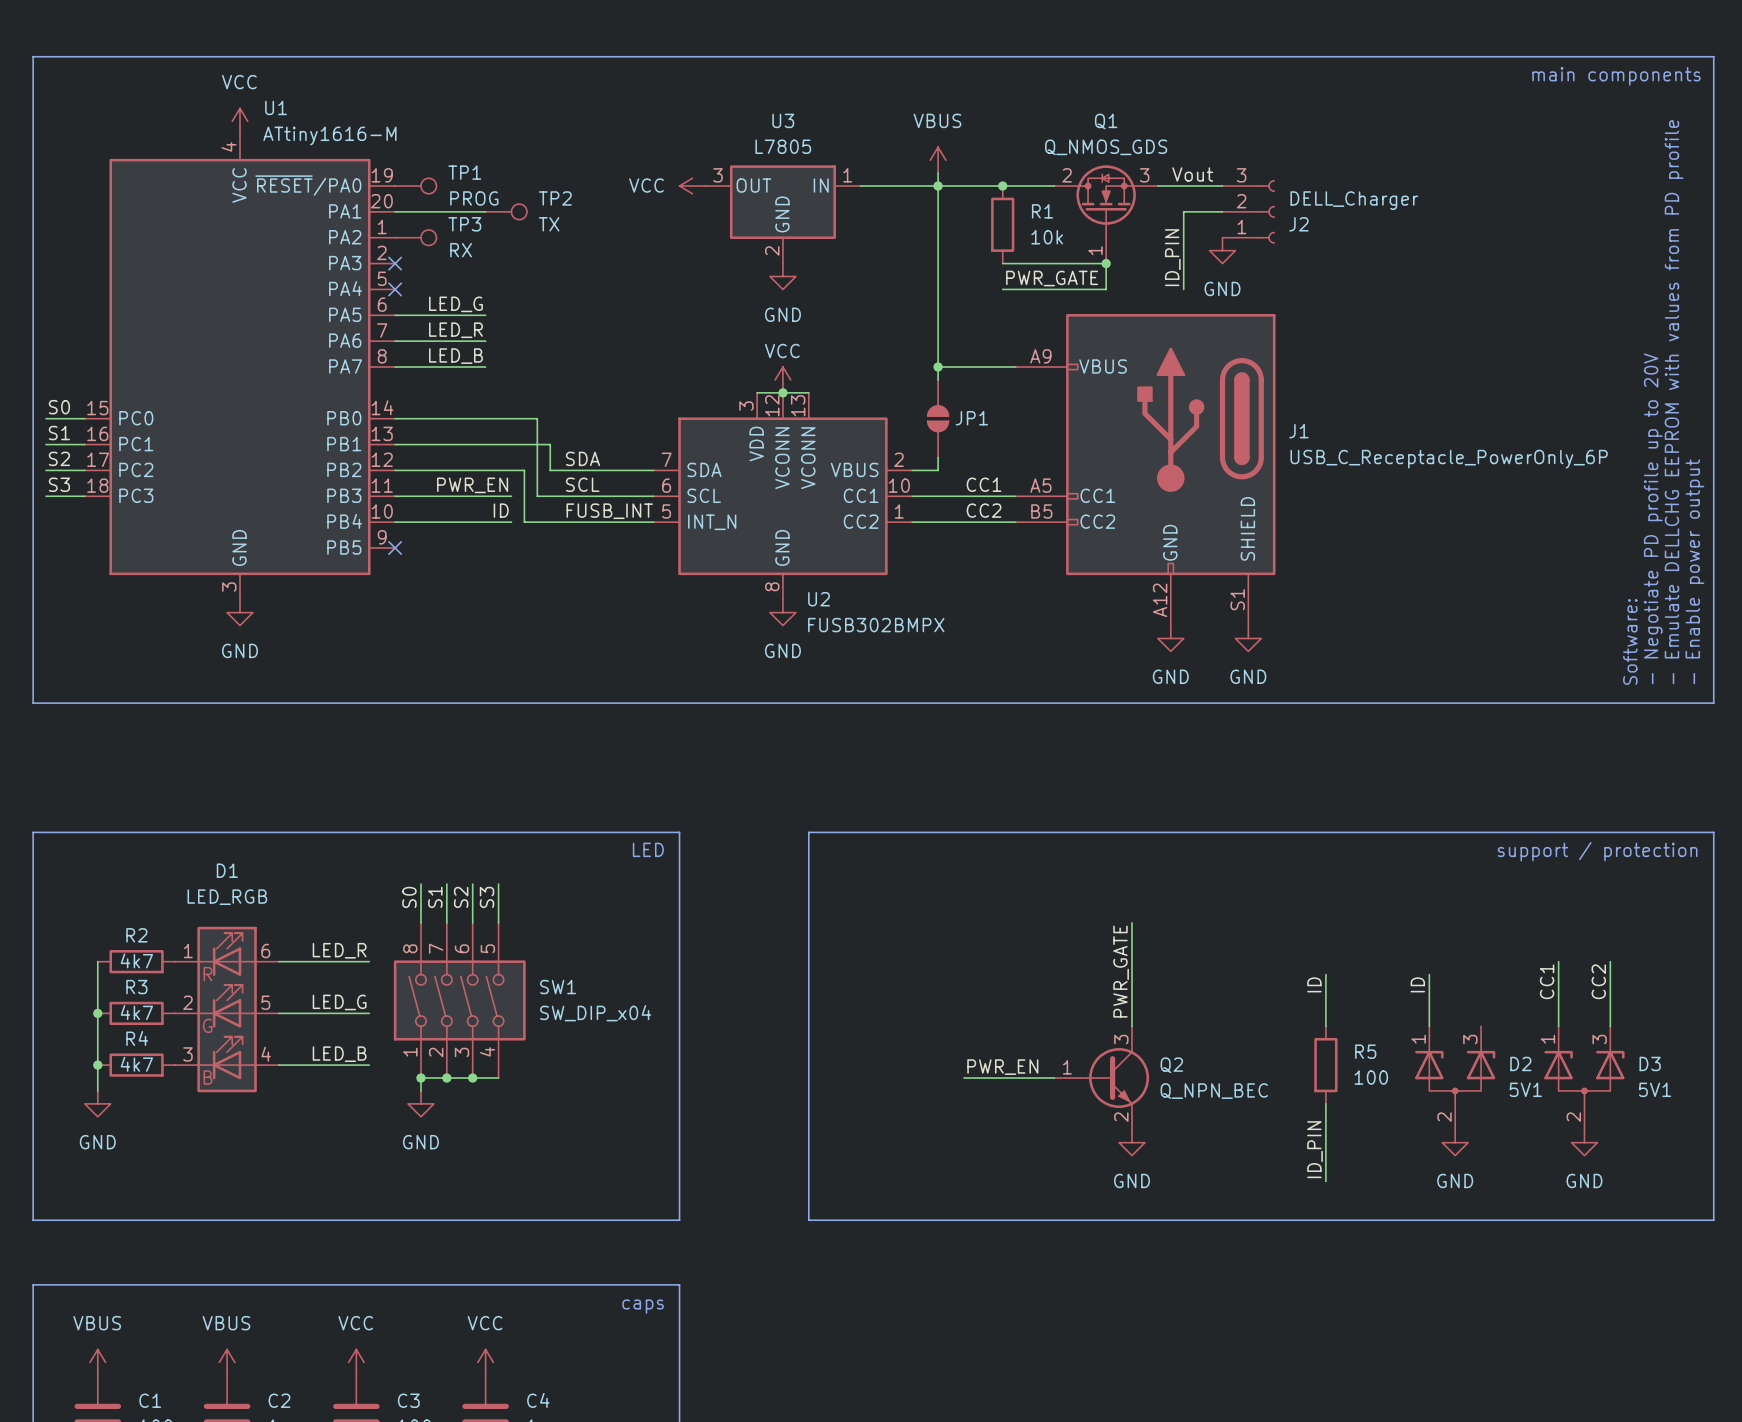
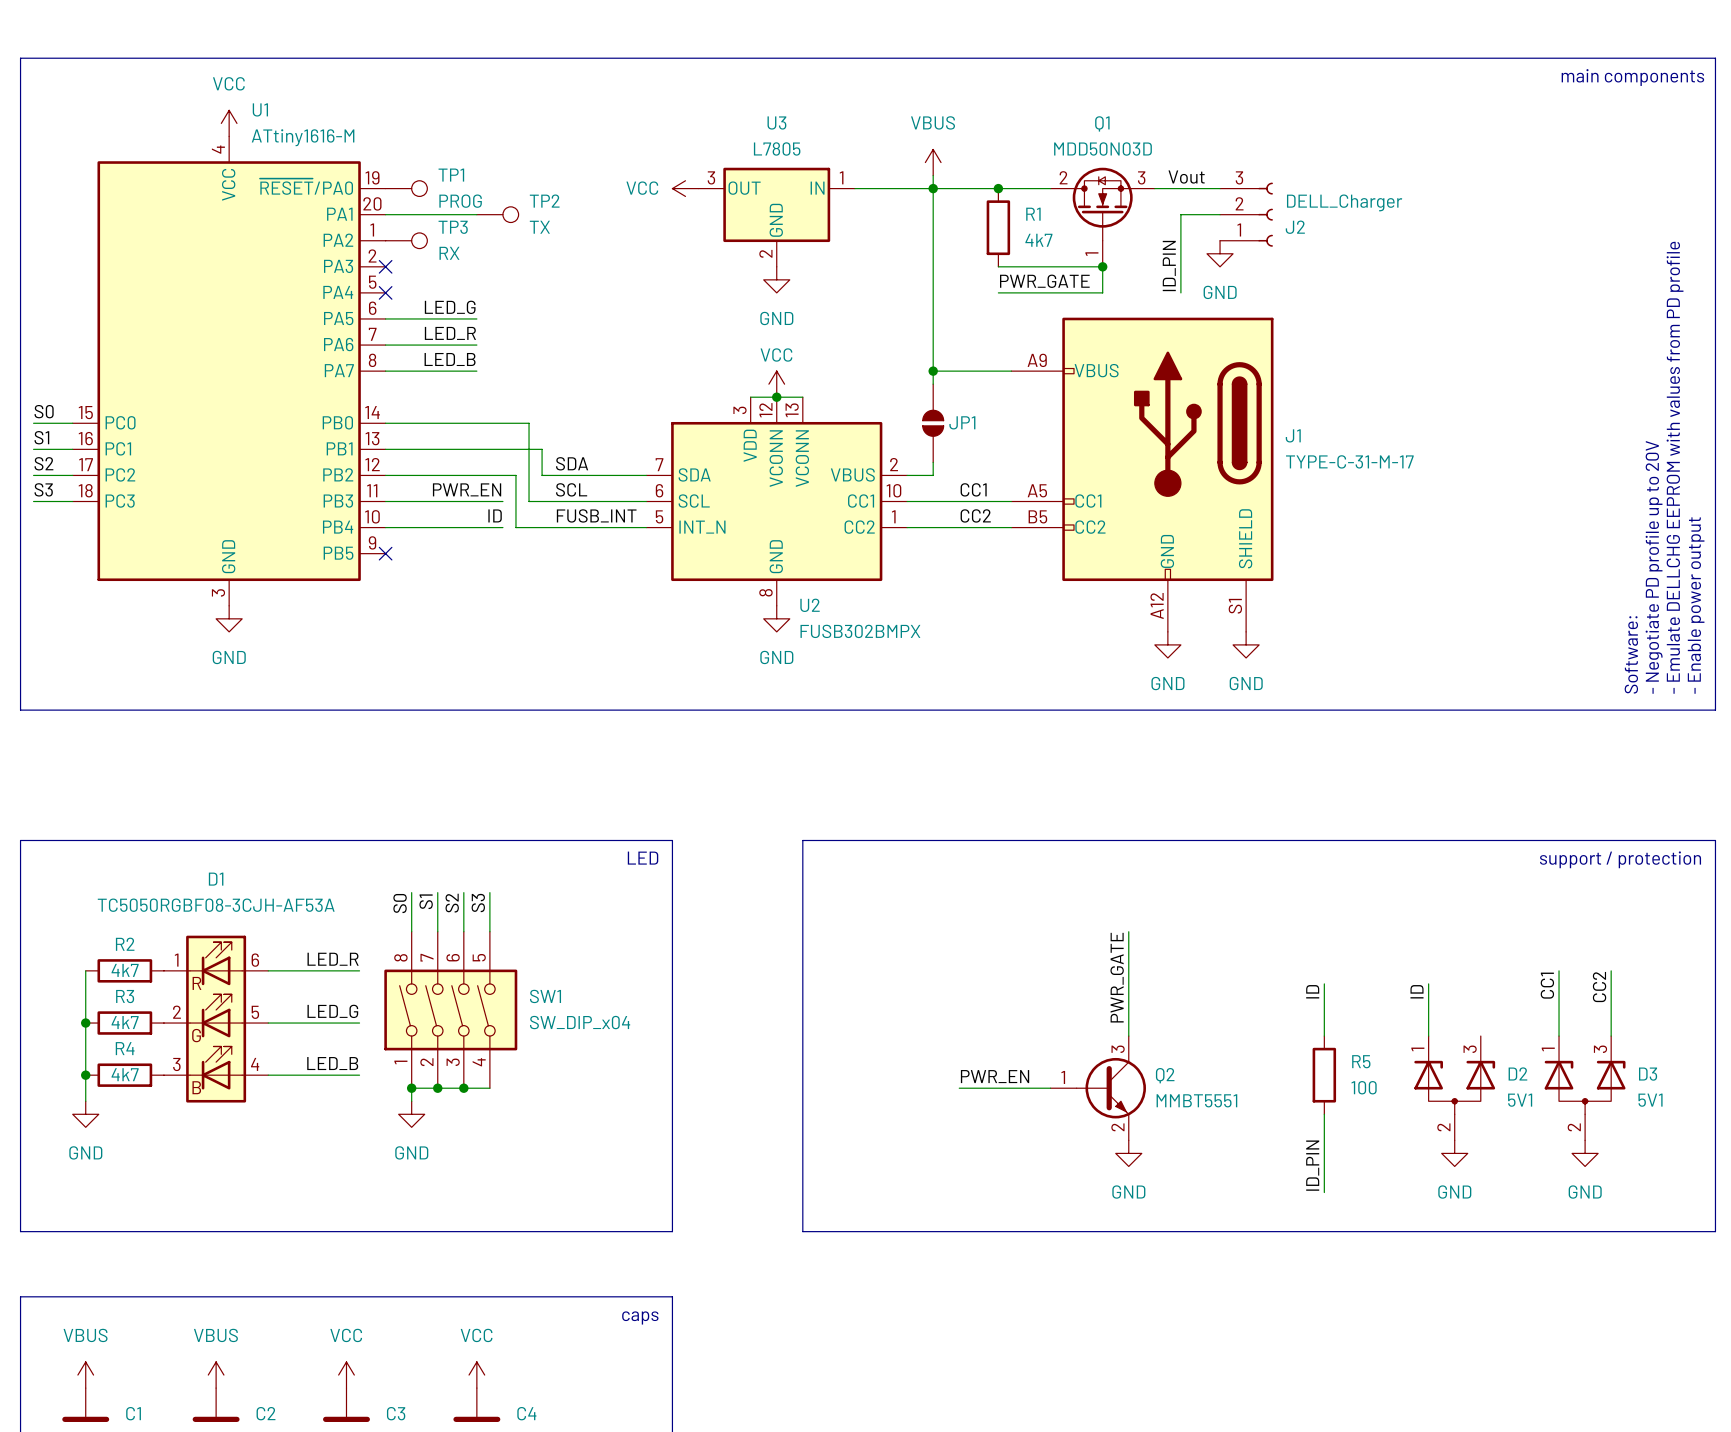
Q1 value: Q_NMOS_GDS (1106, 147) -> MDD50N03D (1102, 149)
R1 value: 10k (1047, 237) -> 4k7 (1038, 240)
J1 value: USB_C_Receptacle_PowerOnly_6P (1449, 459) -> TYPE-C-31-M-17 (1349, 461)
D1 value: LED_RGB (227, 897) -> TC5050RGBF08-3CJH-AF53A (216, 905)
Q2 value: Q_NPN_BEC (1214, 1091) -> MMBT5551 (1196, 1100)

